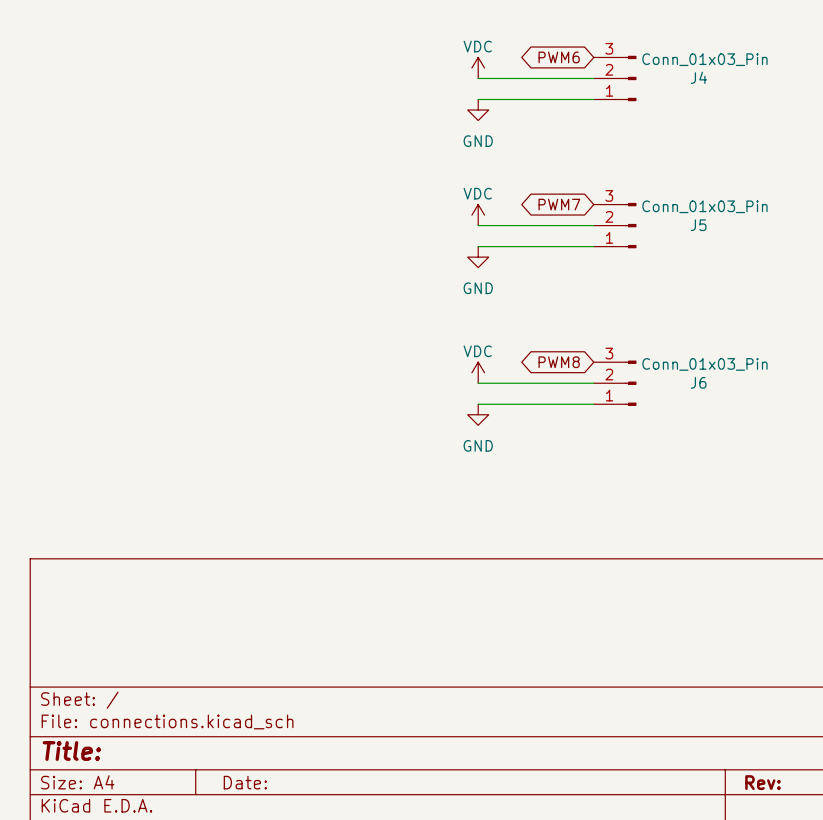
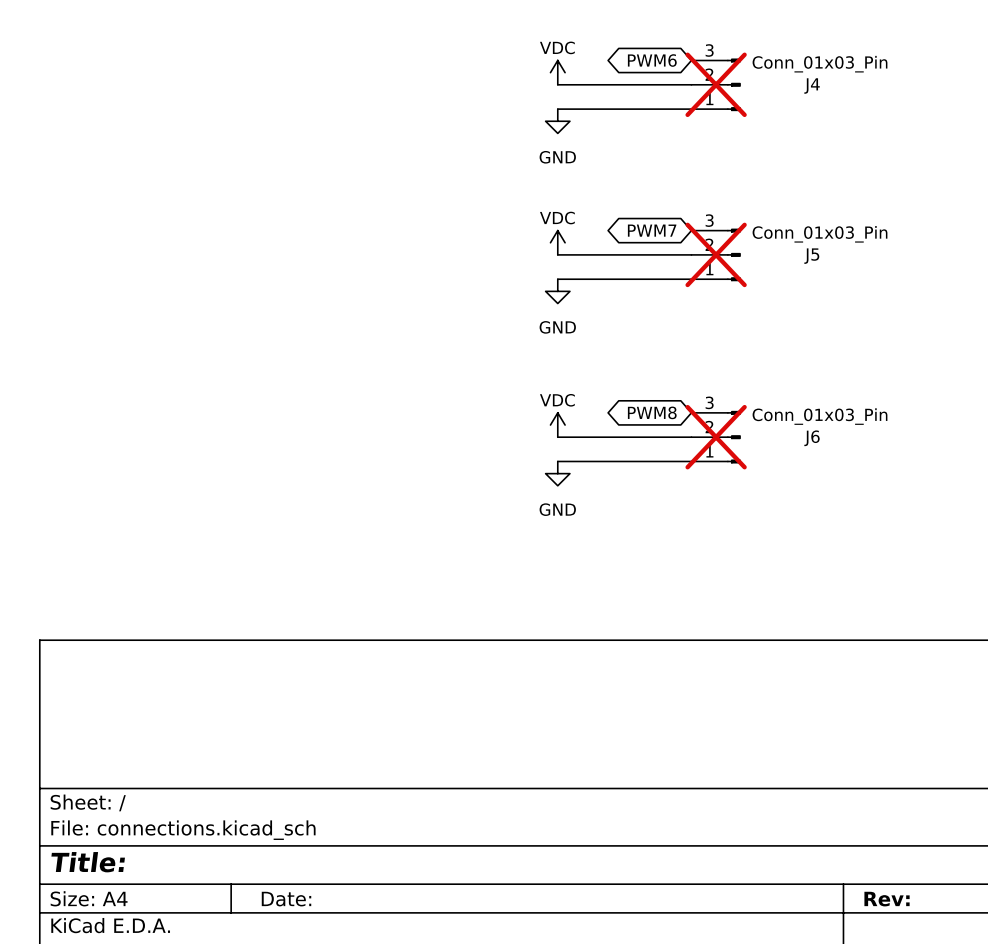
J4 do-not-place cross: none -> (716, 84)
J5 do-not-place cross: none -> (716, 254)
J6 do-not-place cross: none -> (716, 437)

